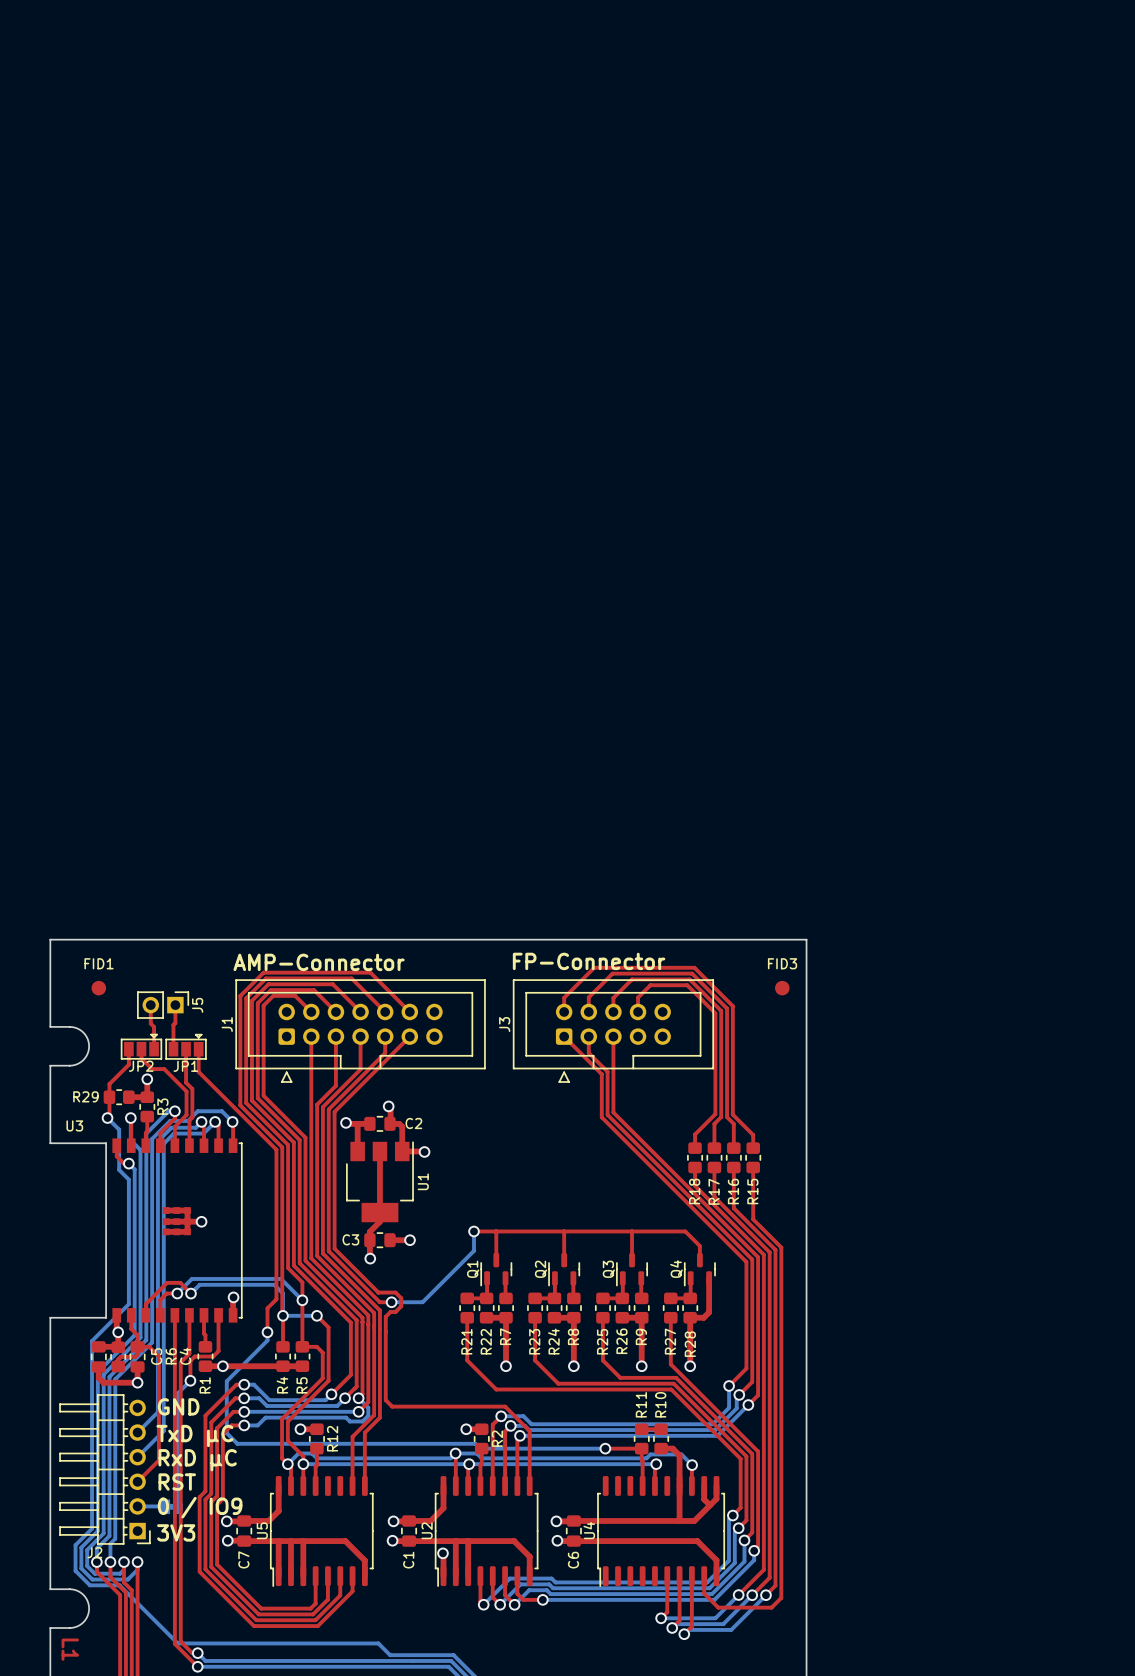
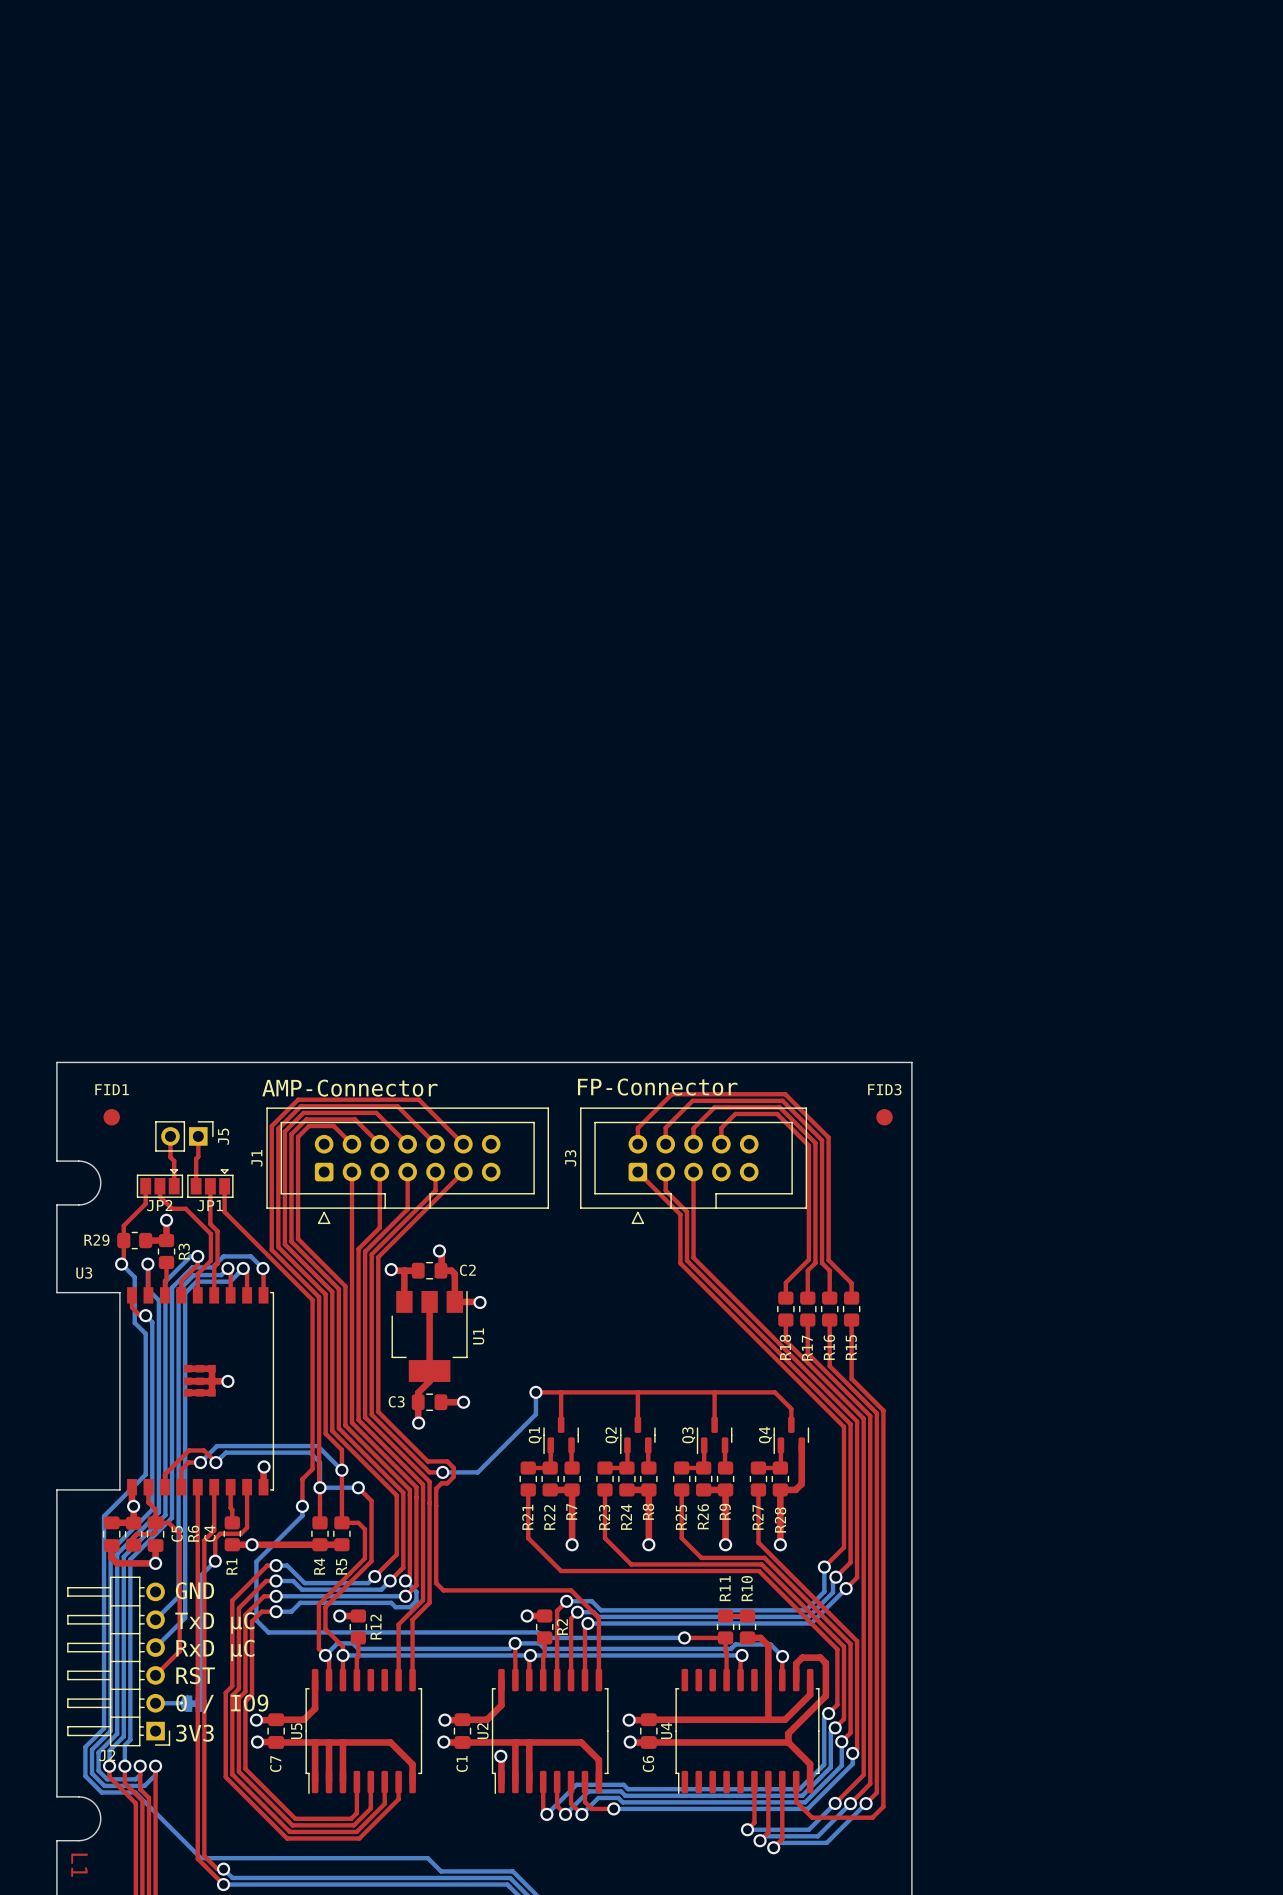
top track: (704, 1485) (704, 1499) (710, 1505) -> (796, 1680) (796, 1663) (802, 1657) (820, 1657) (825, 1663) (825, 1696) (788, 1733) (788, 1742)

